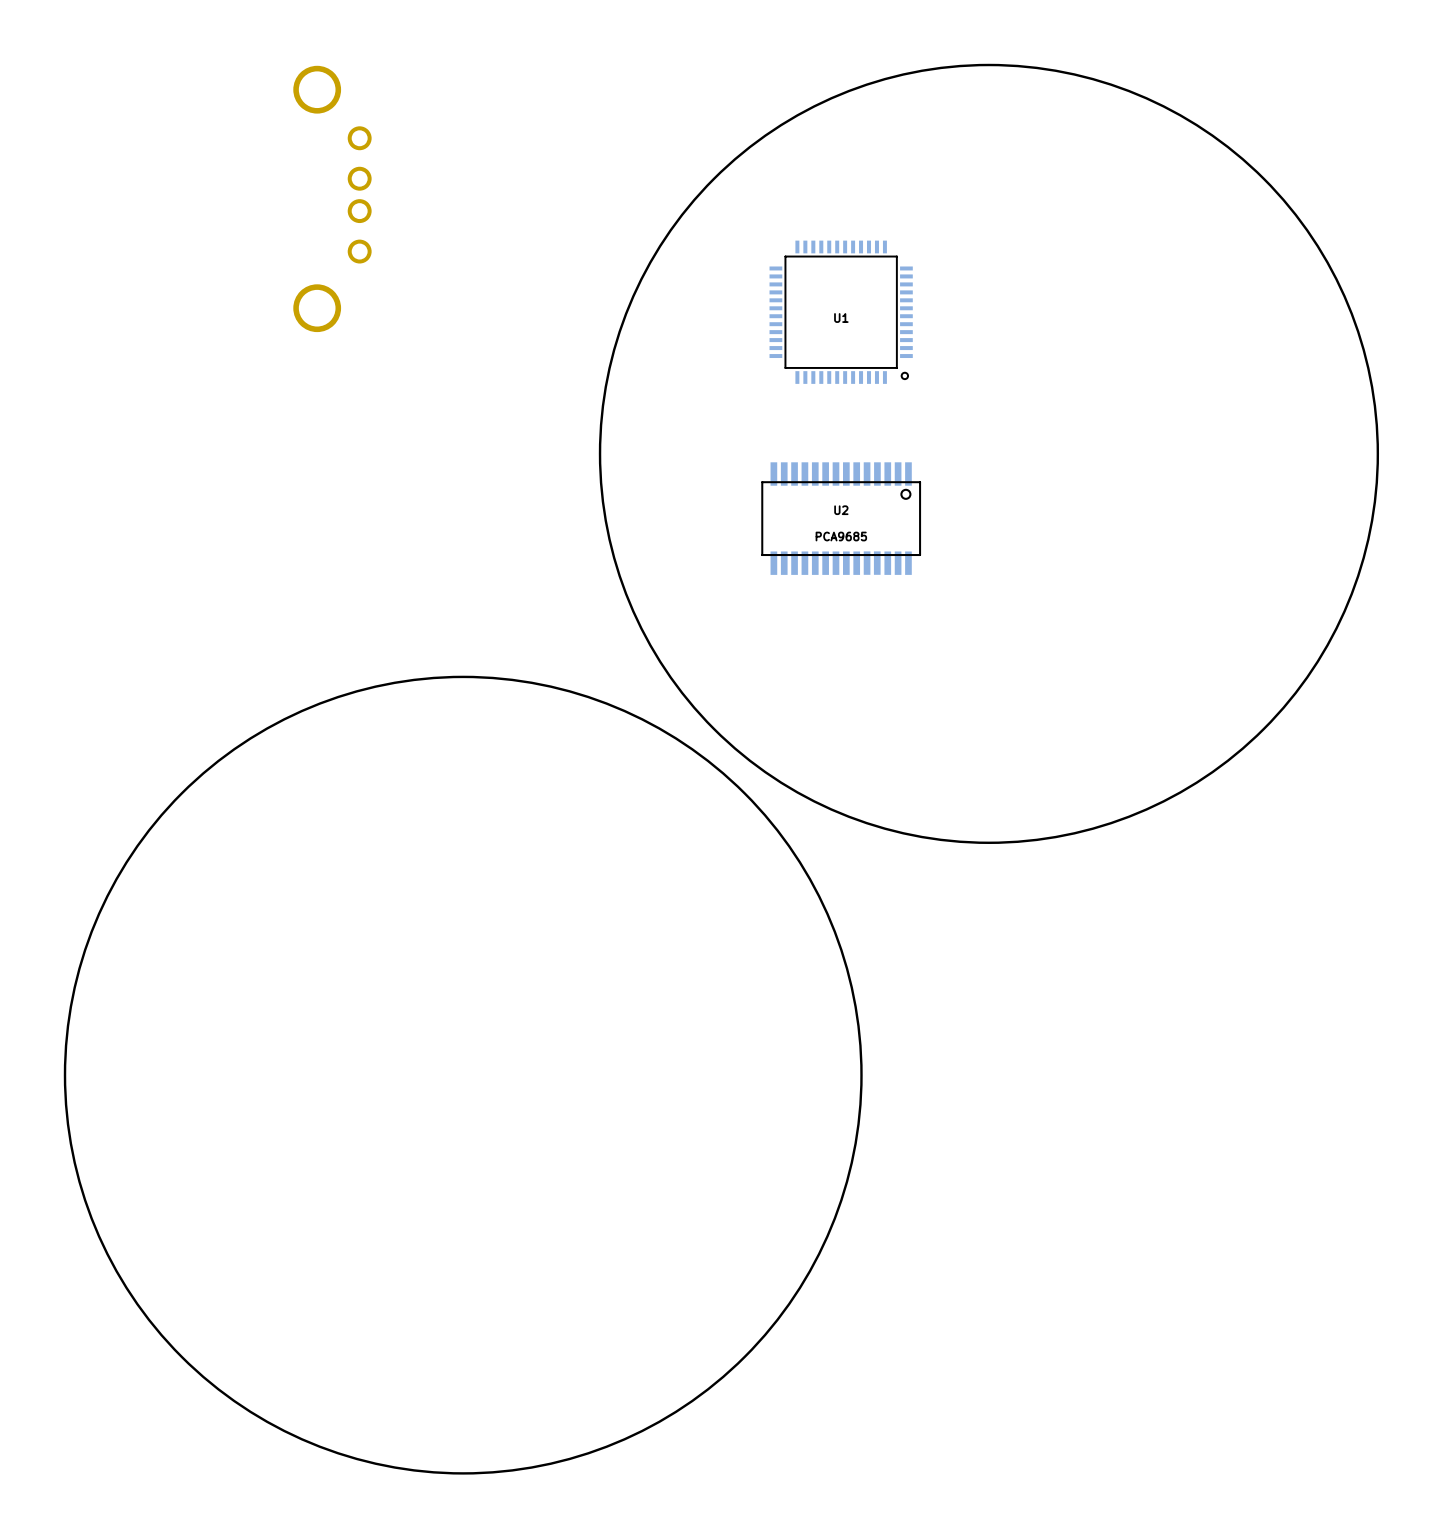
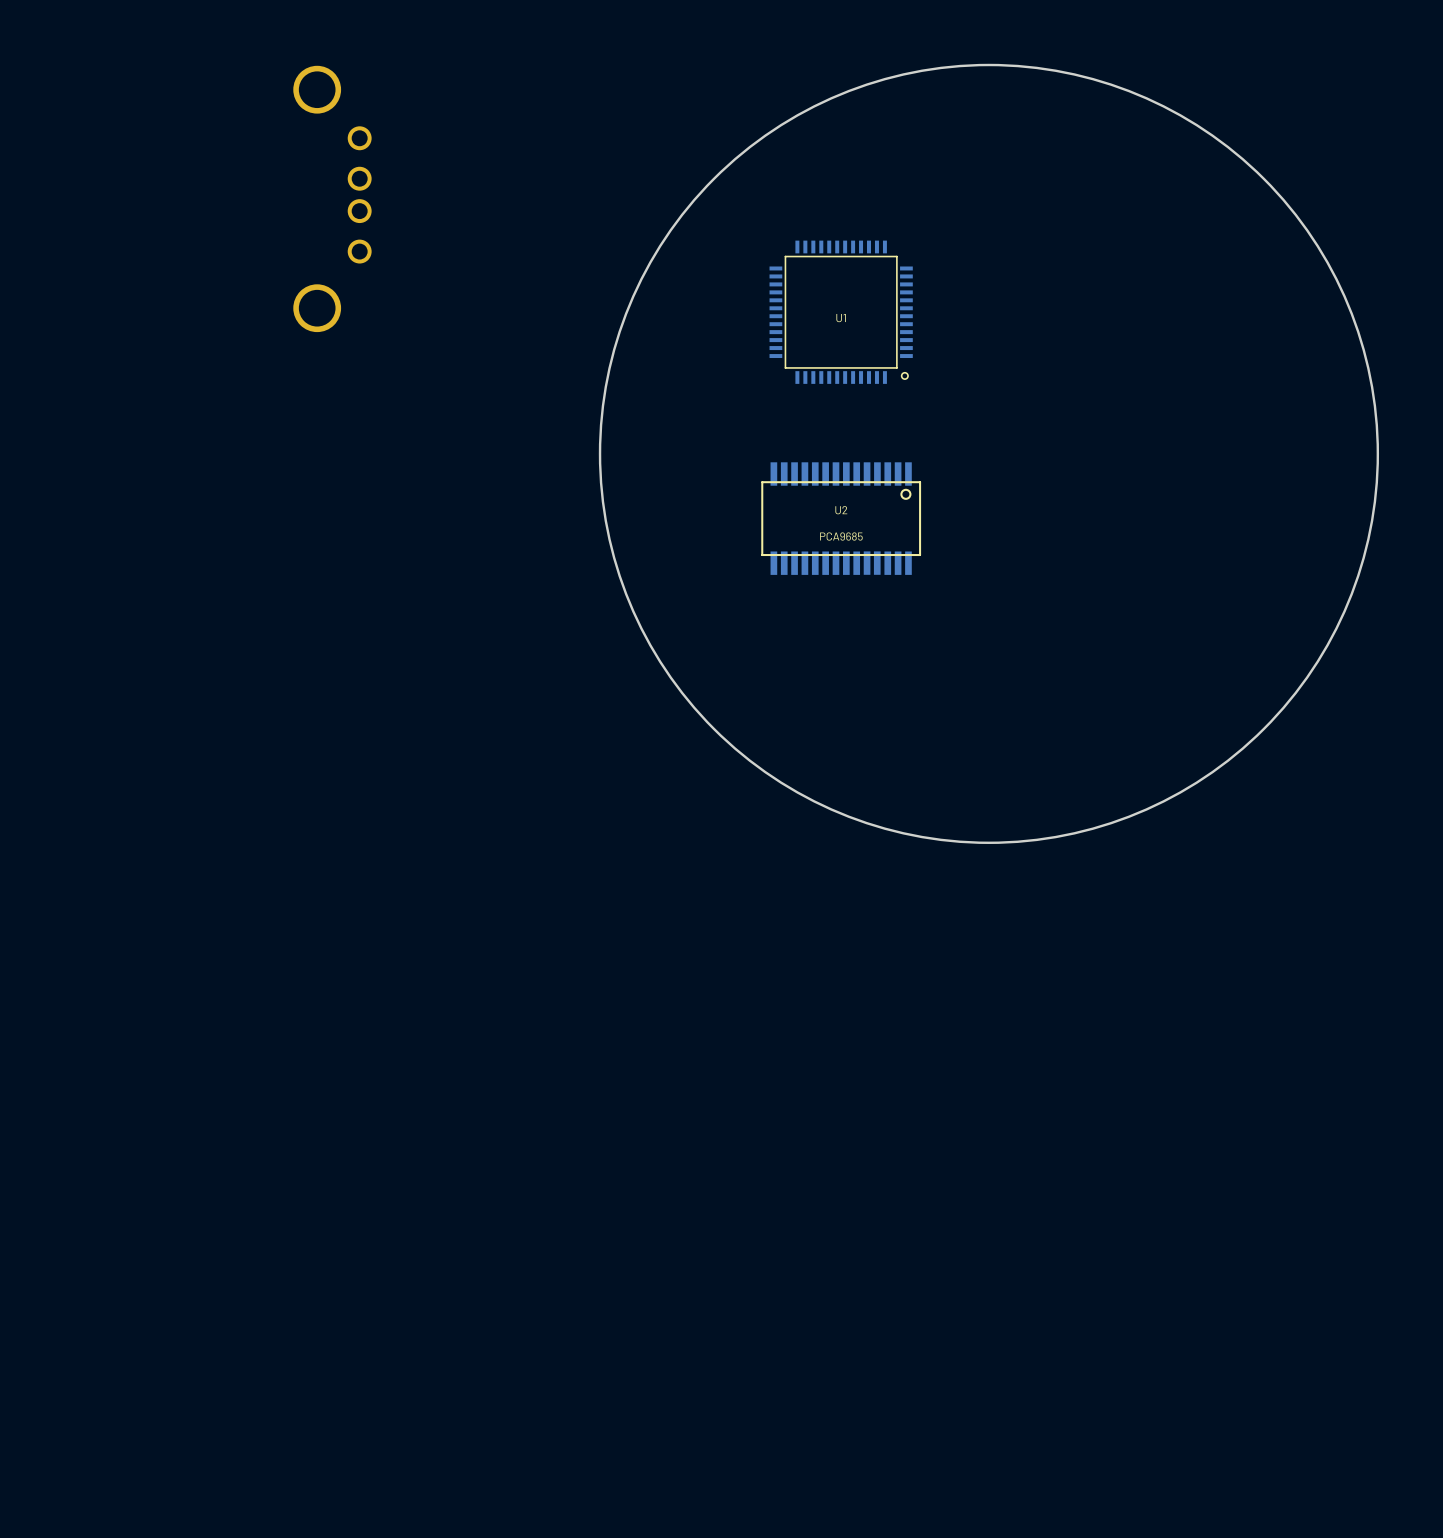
round board edge: [63, 675, 863, 1475] -> none

